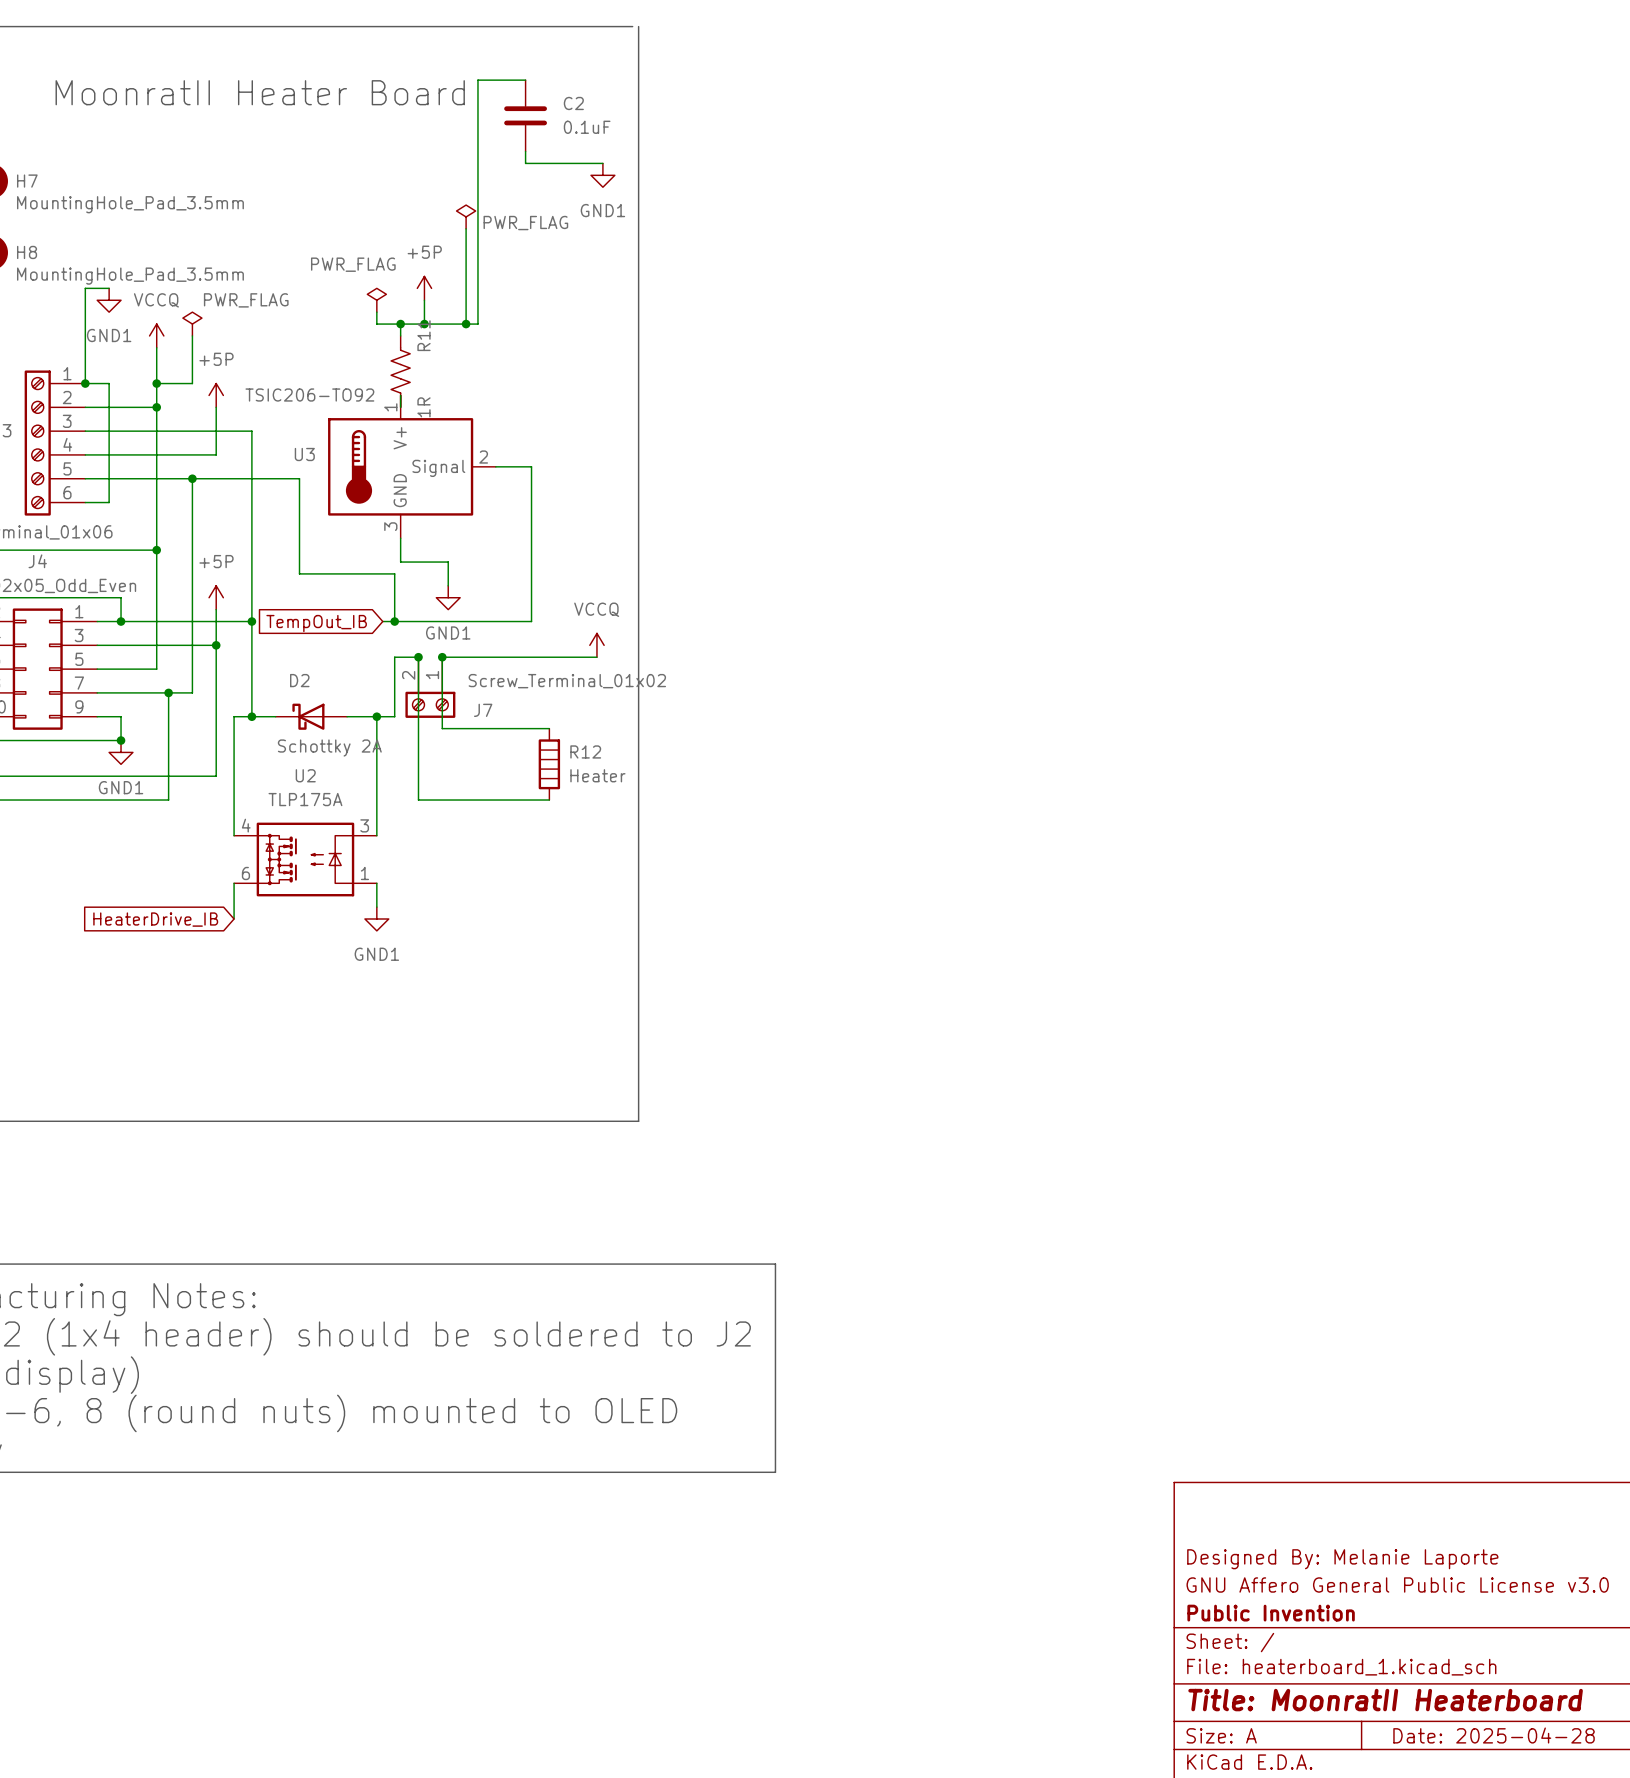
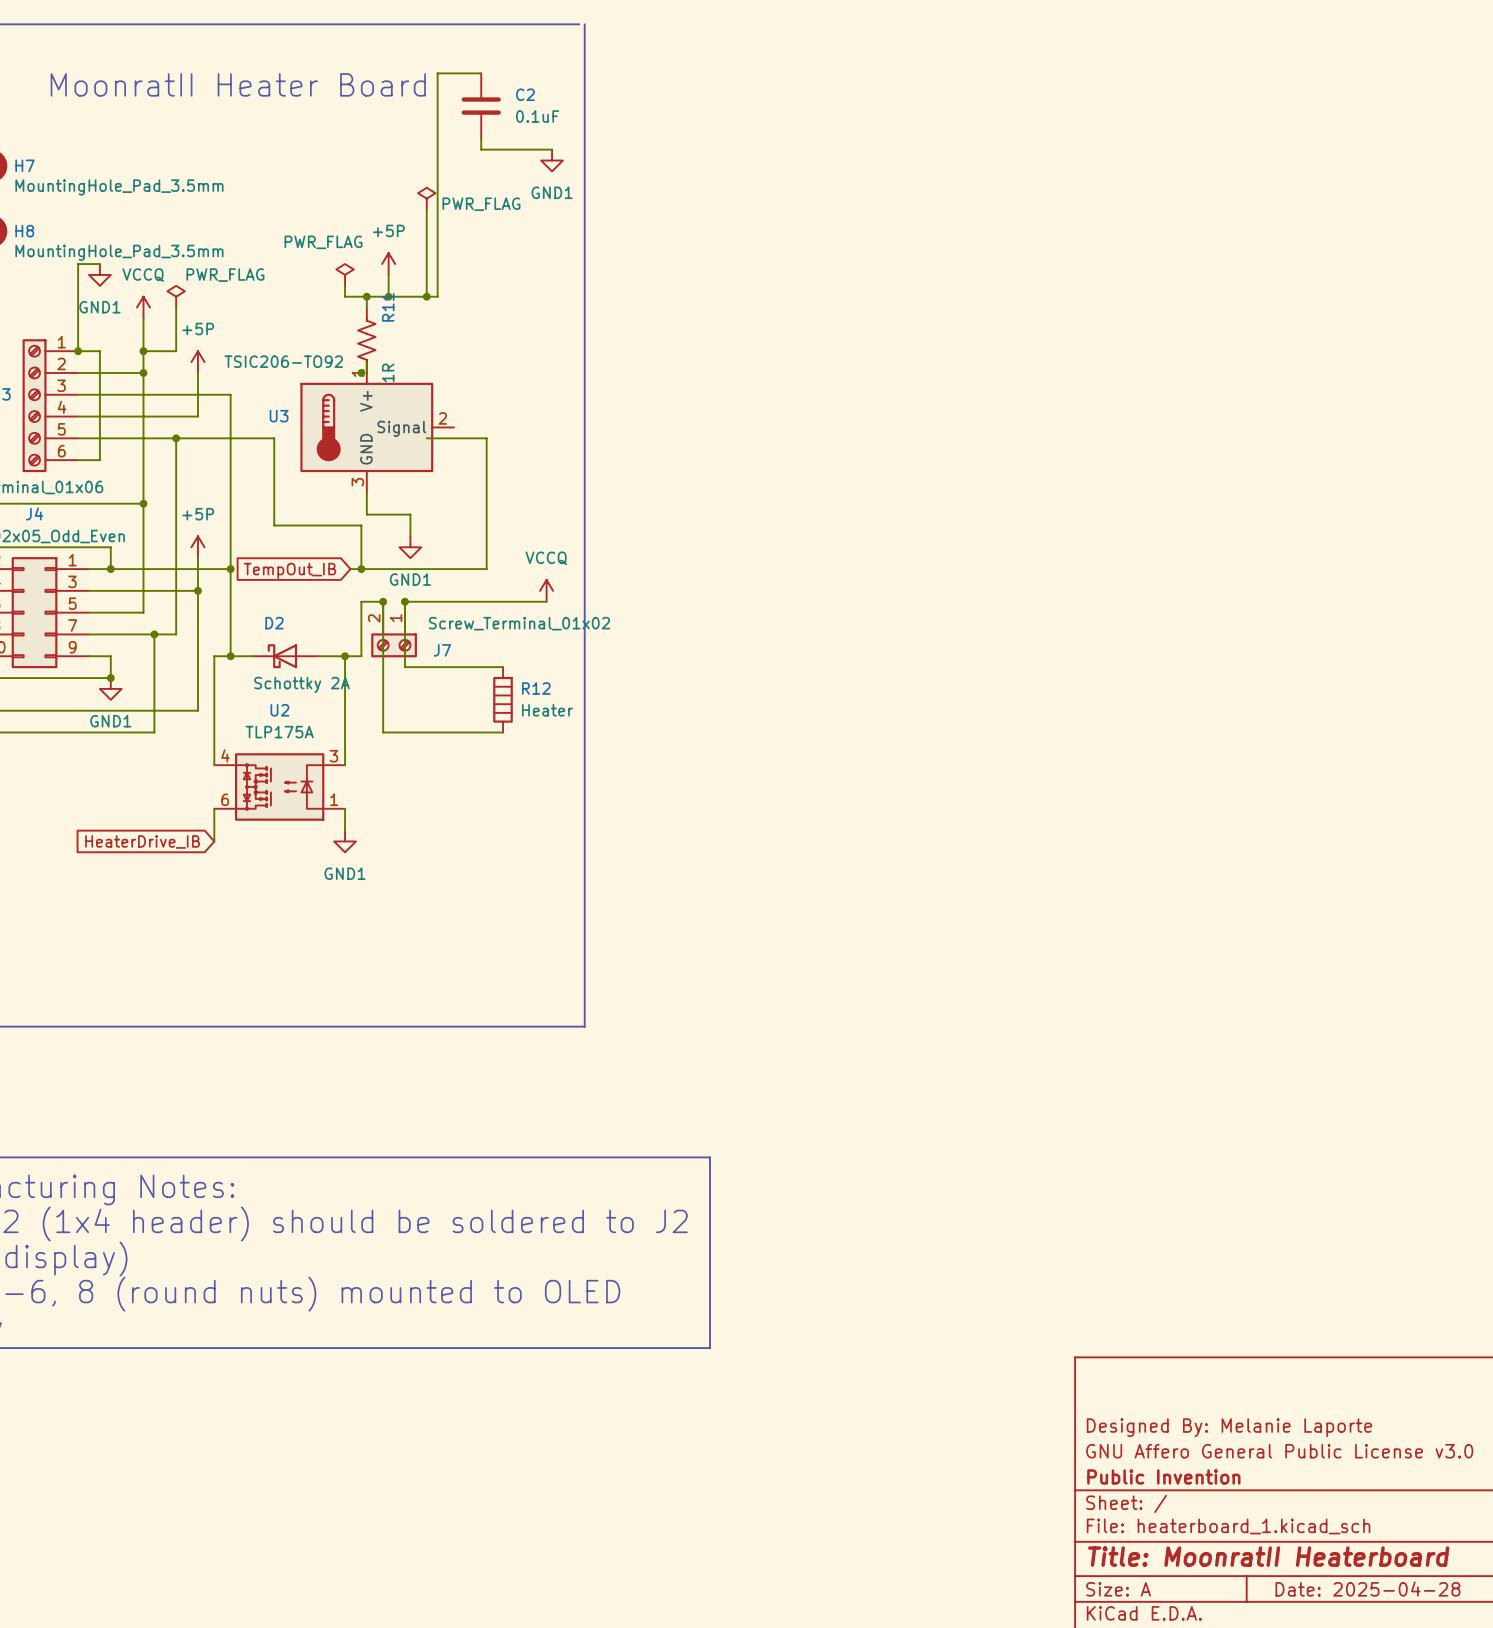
junction: none -> (361, 372)
wire: (495, 466) (531, 466) (531, 478) -> (426, 438) (486, 438)

